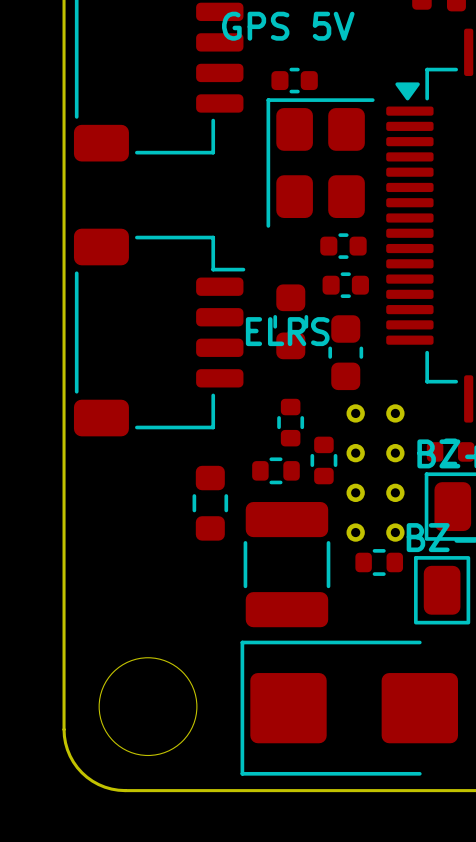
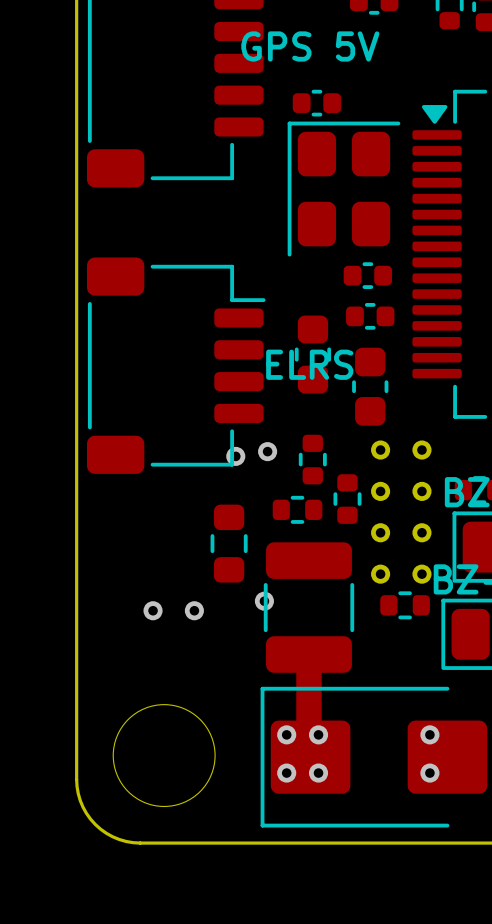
via: none -> (267, 451)
via: none -> (235, 456)
via: none -> (264, 601)
via: none -> (153, 610)
via: none -> (194, 610)
track: none -> (308, 654) (308, 734)
via: none -> (286, 734)
via: none -> (318, 734)
via: none -> (429, 734)
via: none -> (286, 773)
via: none -> (318, 773)
via: none -> (429, 773)

